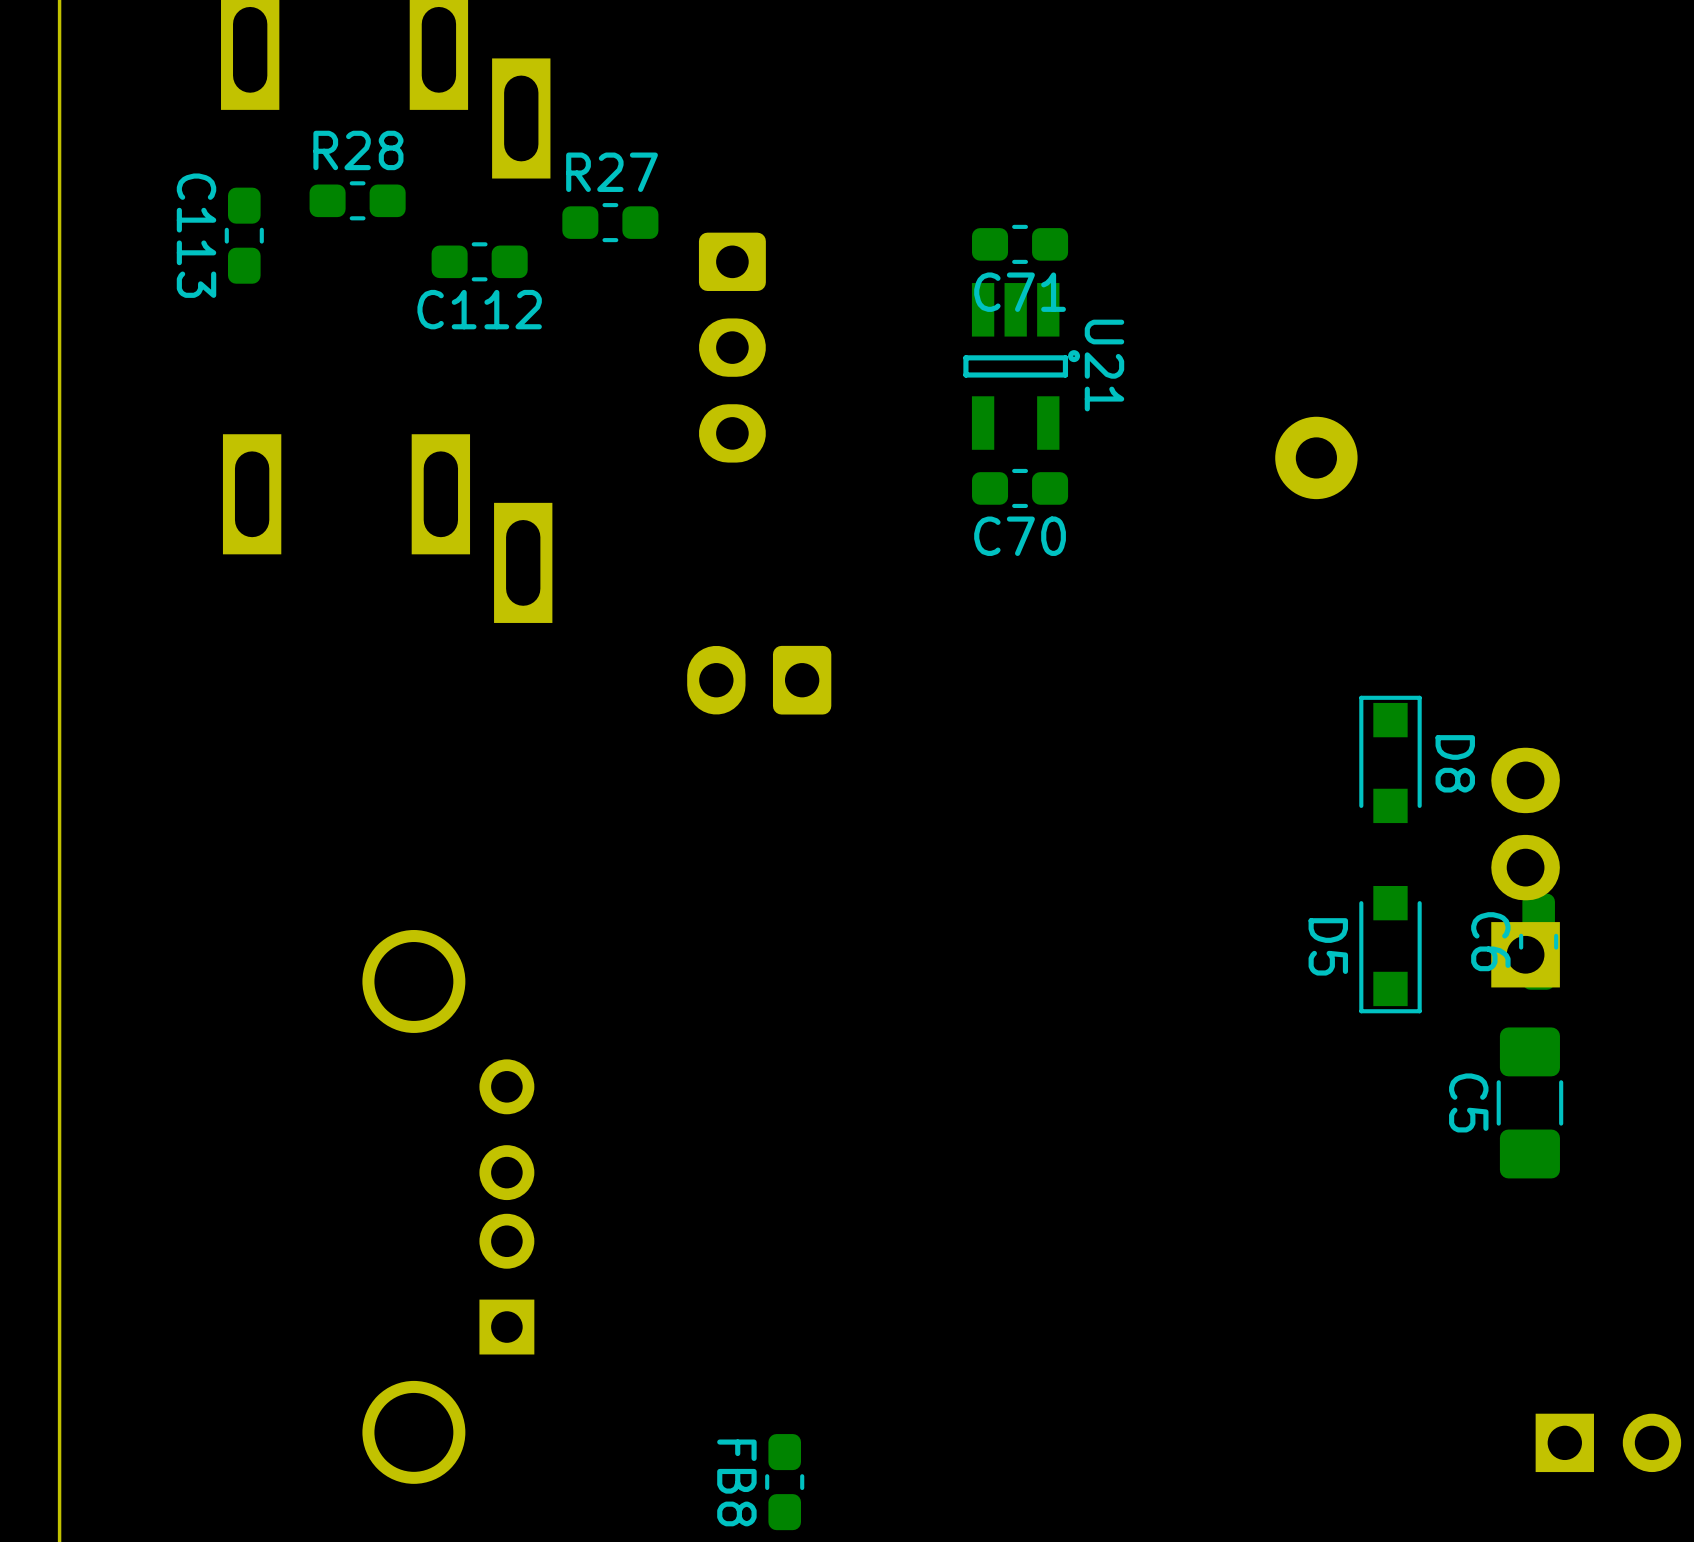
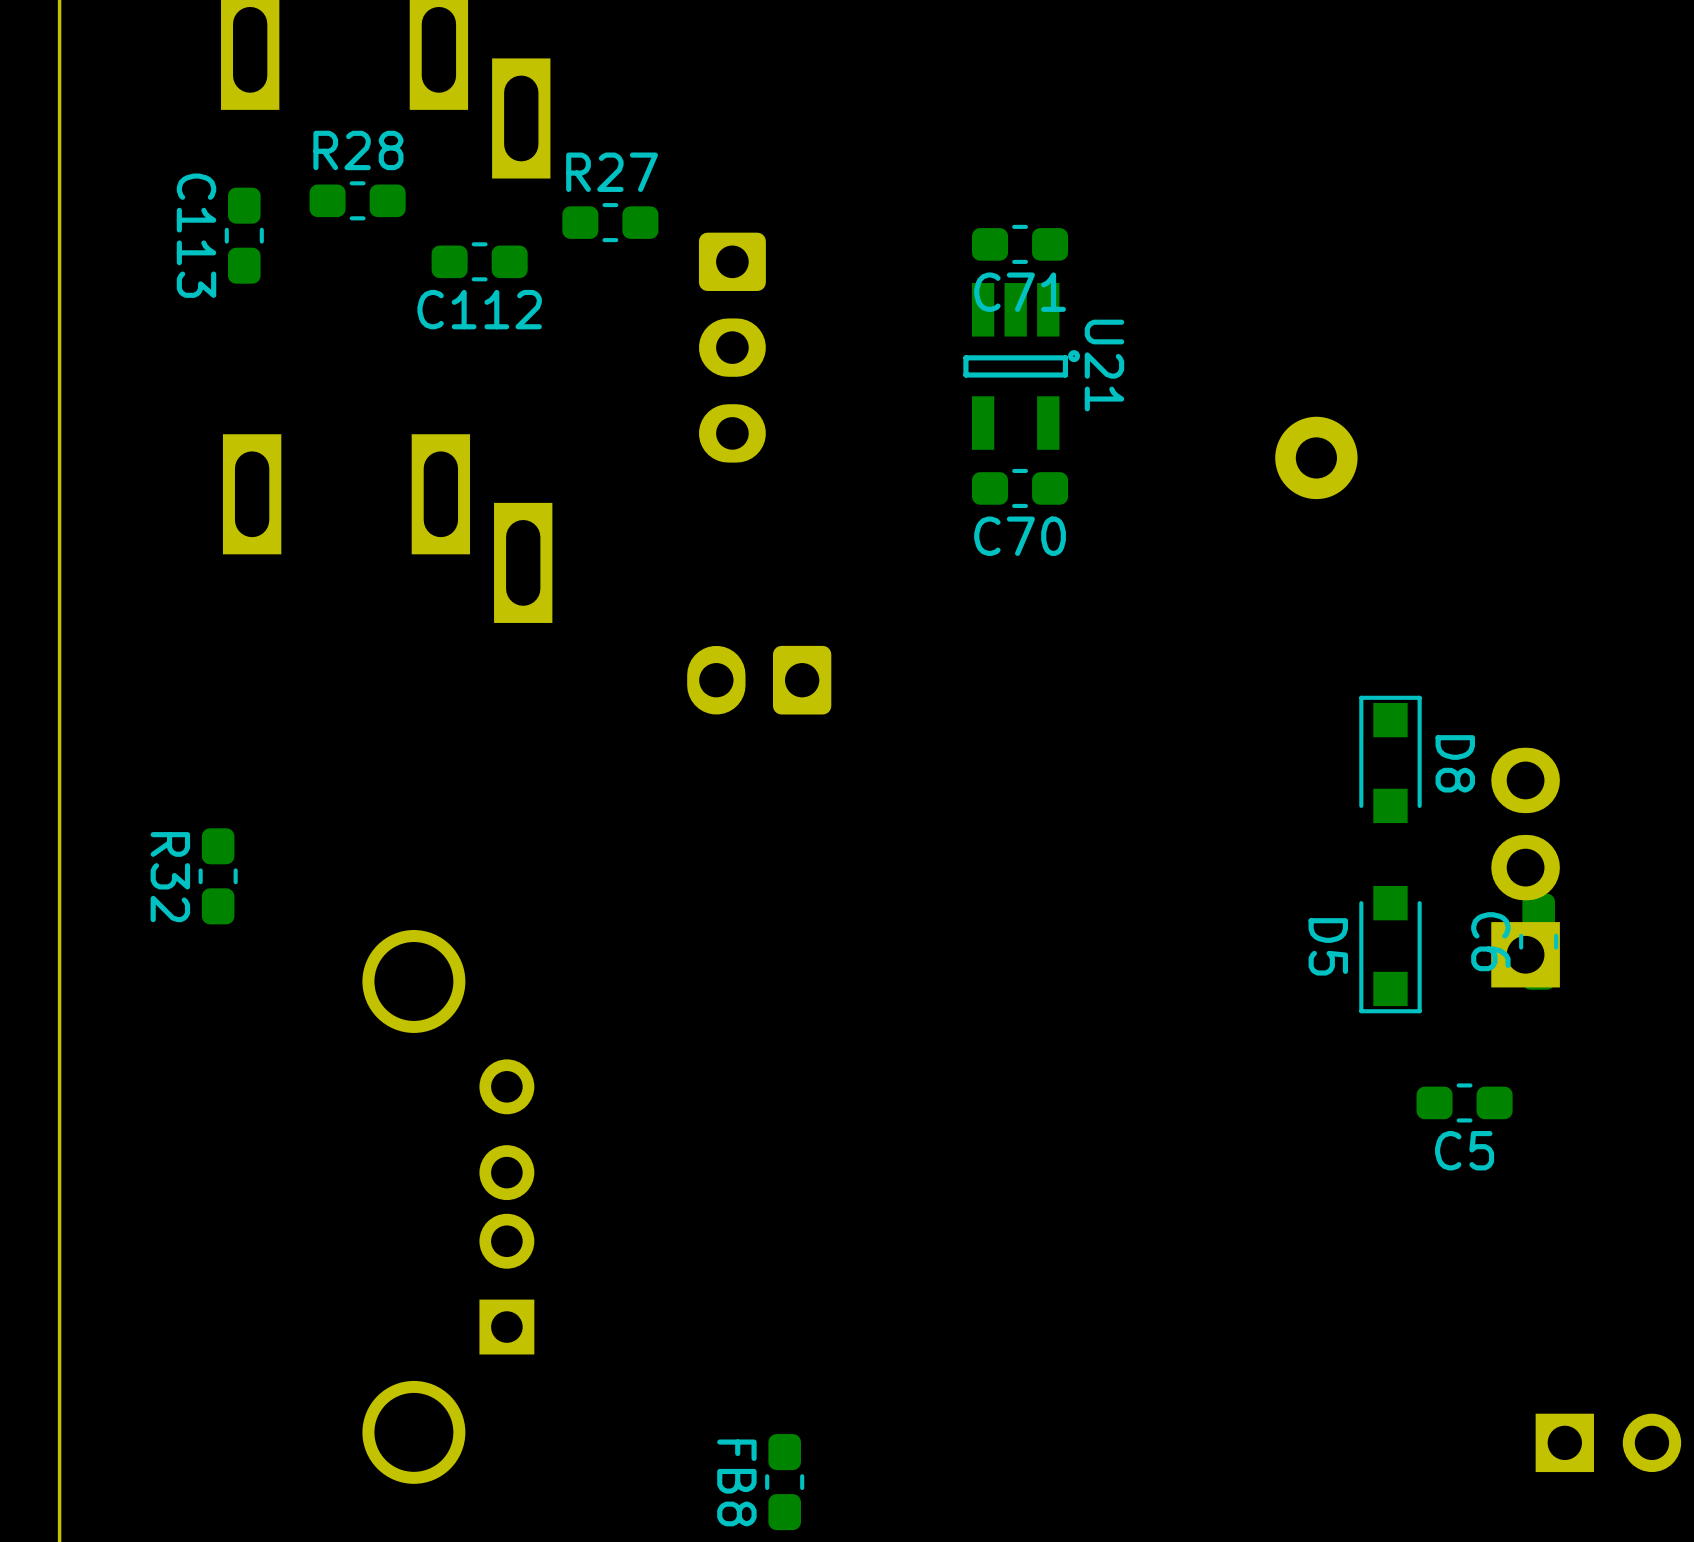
R32: none -> (218, 876)
C5 footprint: [1496, 1027, 1564, 1179] -> [1416, 1083, 1513, 1123]
C5 name position: C5 (1468, 1102) -> C5 (1464, 1150)

